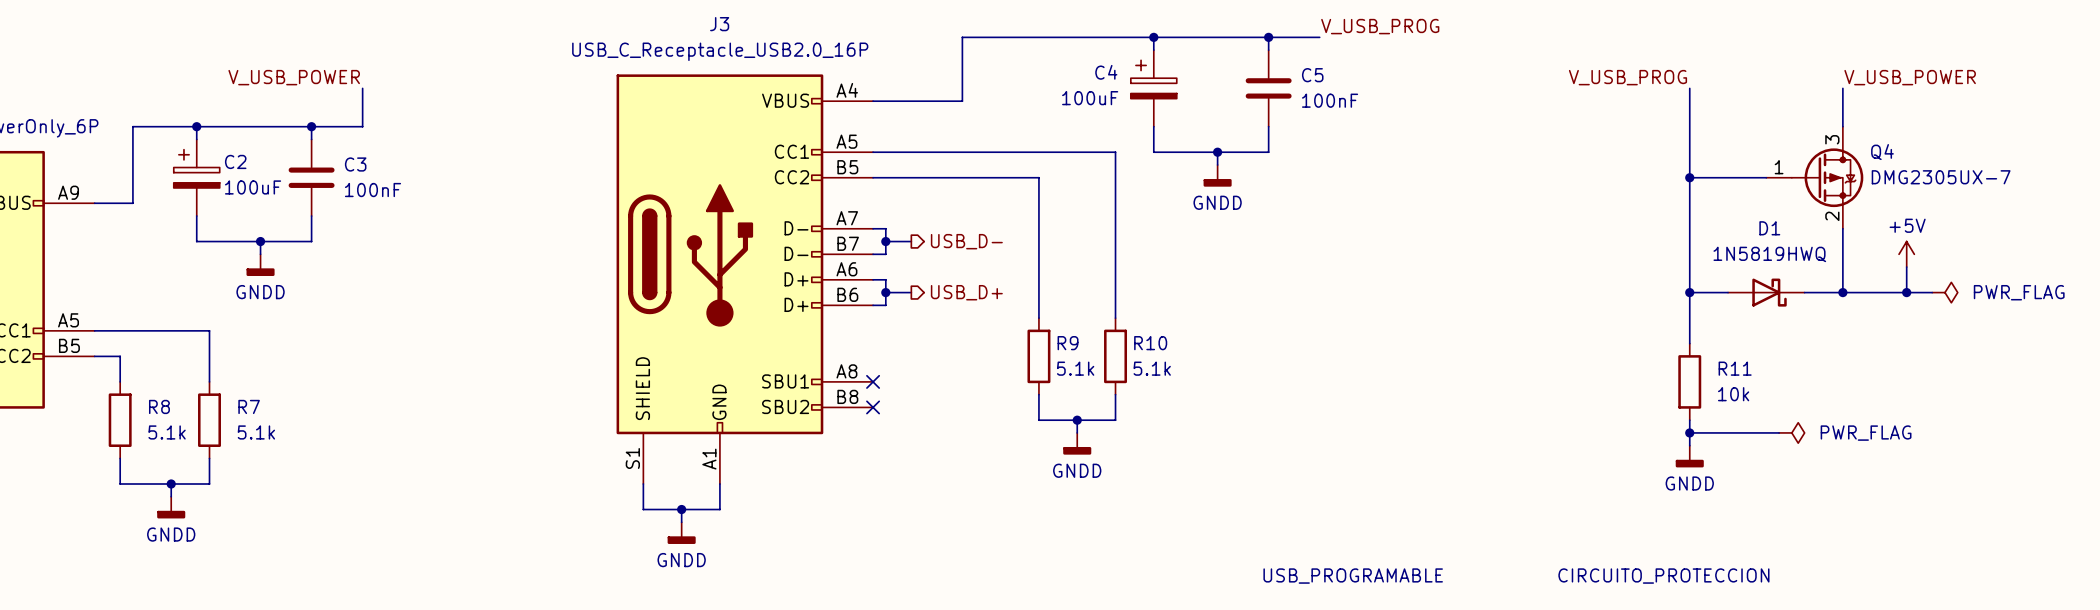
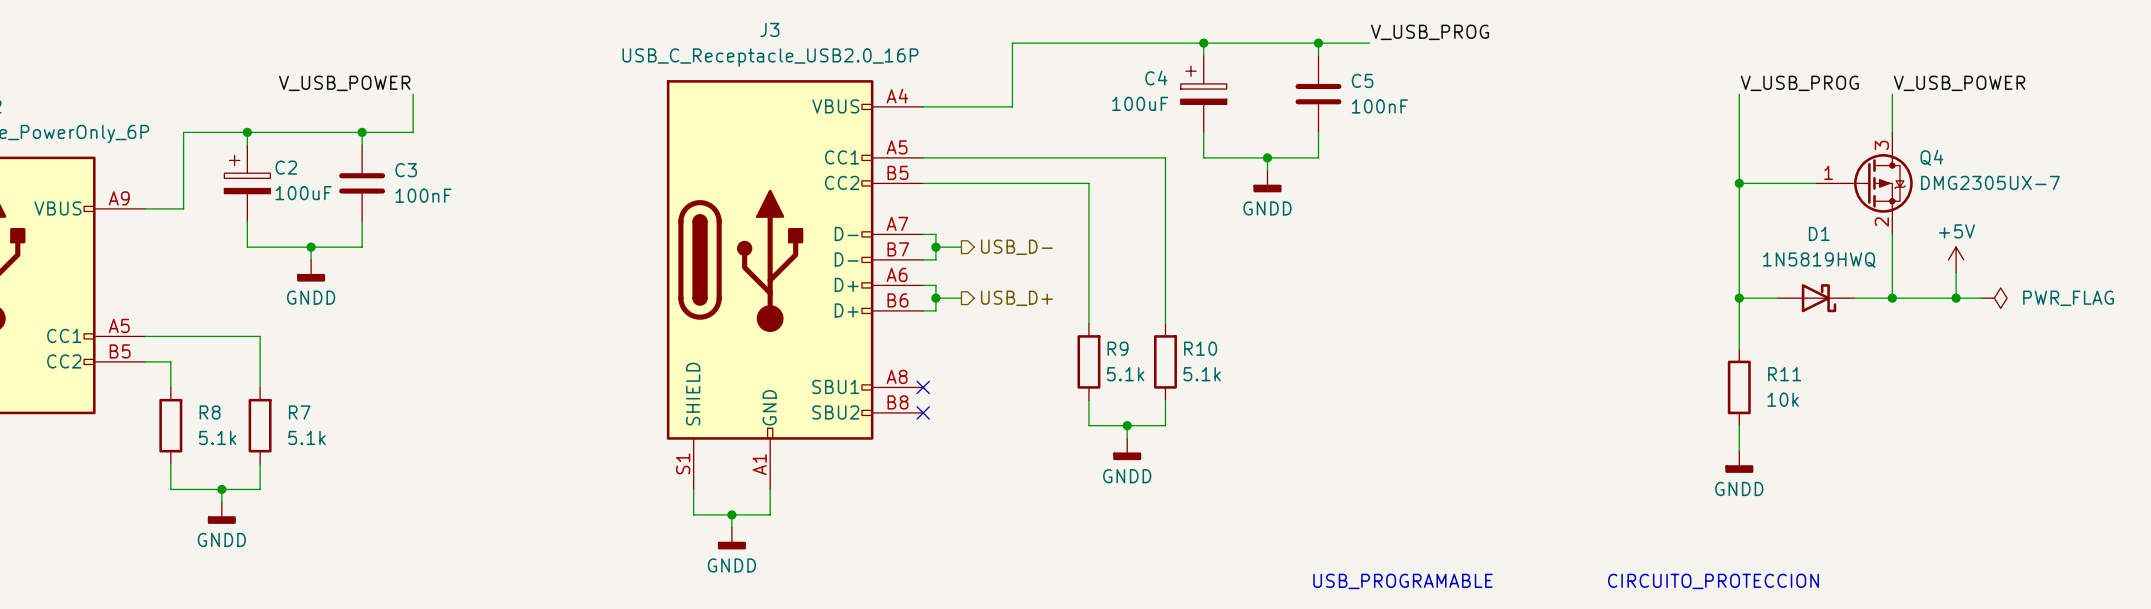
label position: V_USB_PROG (1627, 77) -> V_USB_PROG (1799, 83)
wire: (1689, 432) (1779, 432) -> none
junction: (1689, 432) -> none
power symbol: PWR_FLAG (1791, 432) -> none

